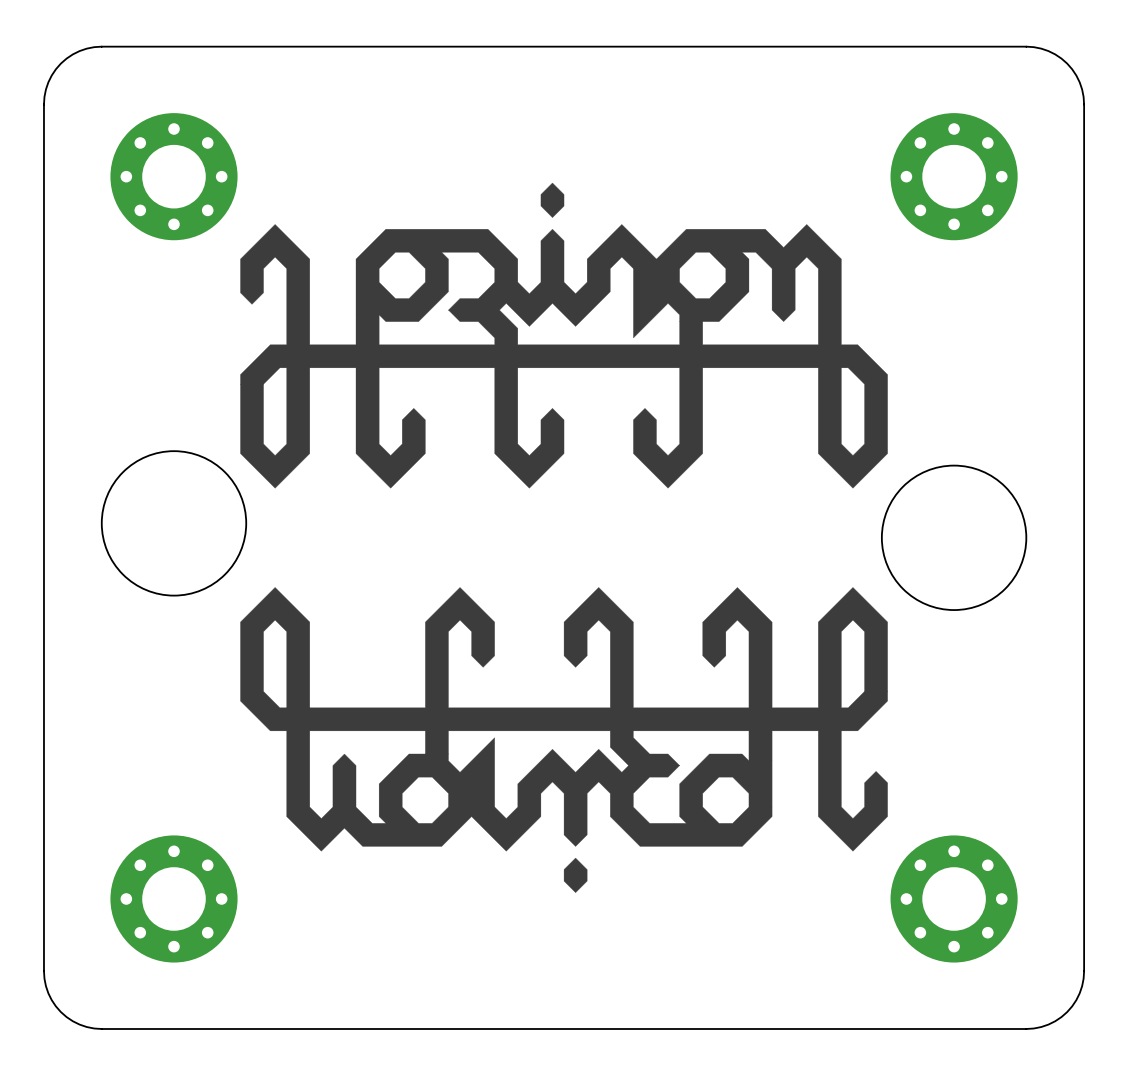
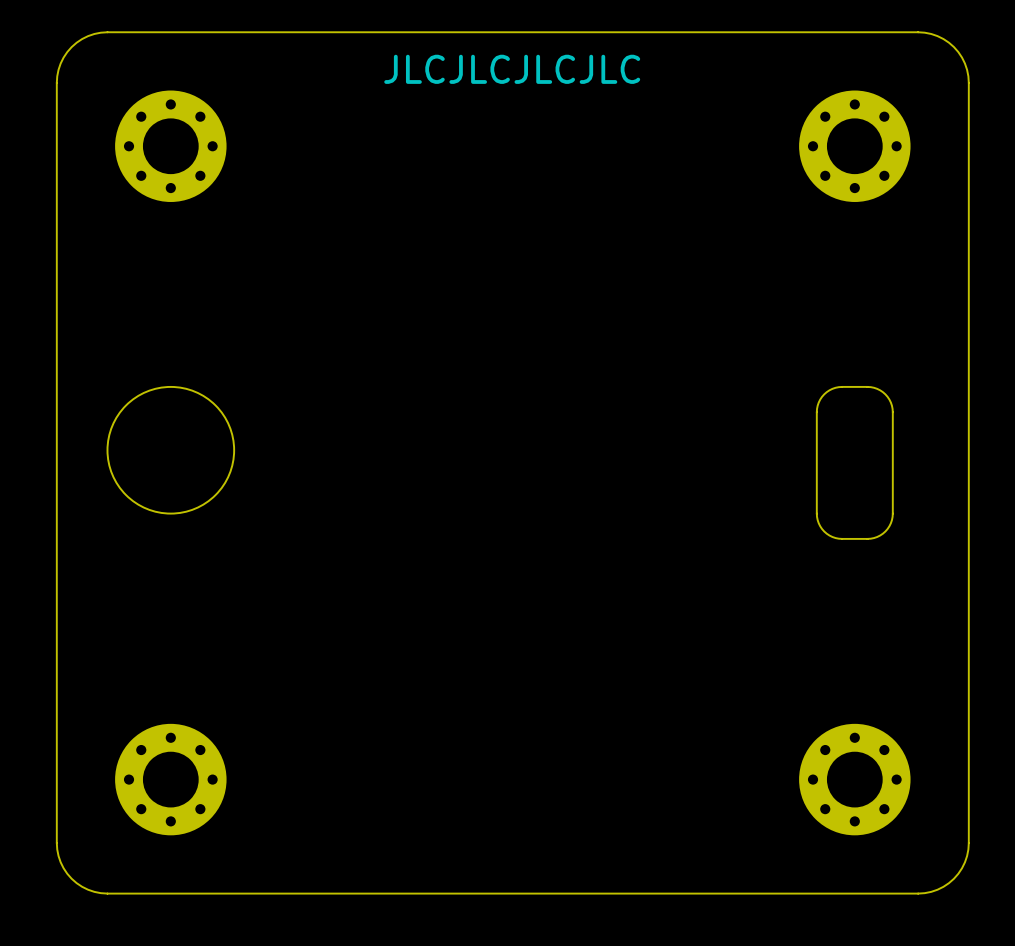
text: none -> JLCJLCJLCJLC (512, 69)
drawing: [240, 182, 888, 489] -> none
board edge: none -> (867, 386) (832, 388) (822, 396) (817, 405) (817, 516) (822, 529) (835, 538) (874, 538) (885, 531) (891, 520) (892, 408) (885, 394) (877, 388) (867, 386)
round board edge: [881, 464, 1028, 611] -> none
drawing: [240, 587, 888, 893] -> none

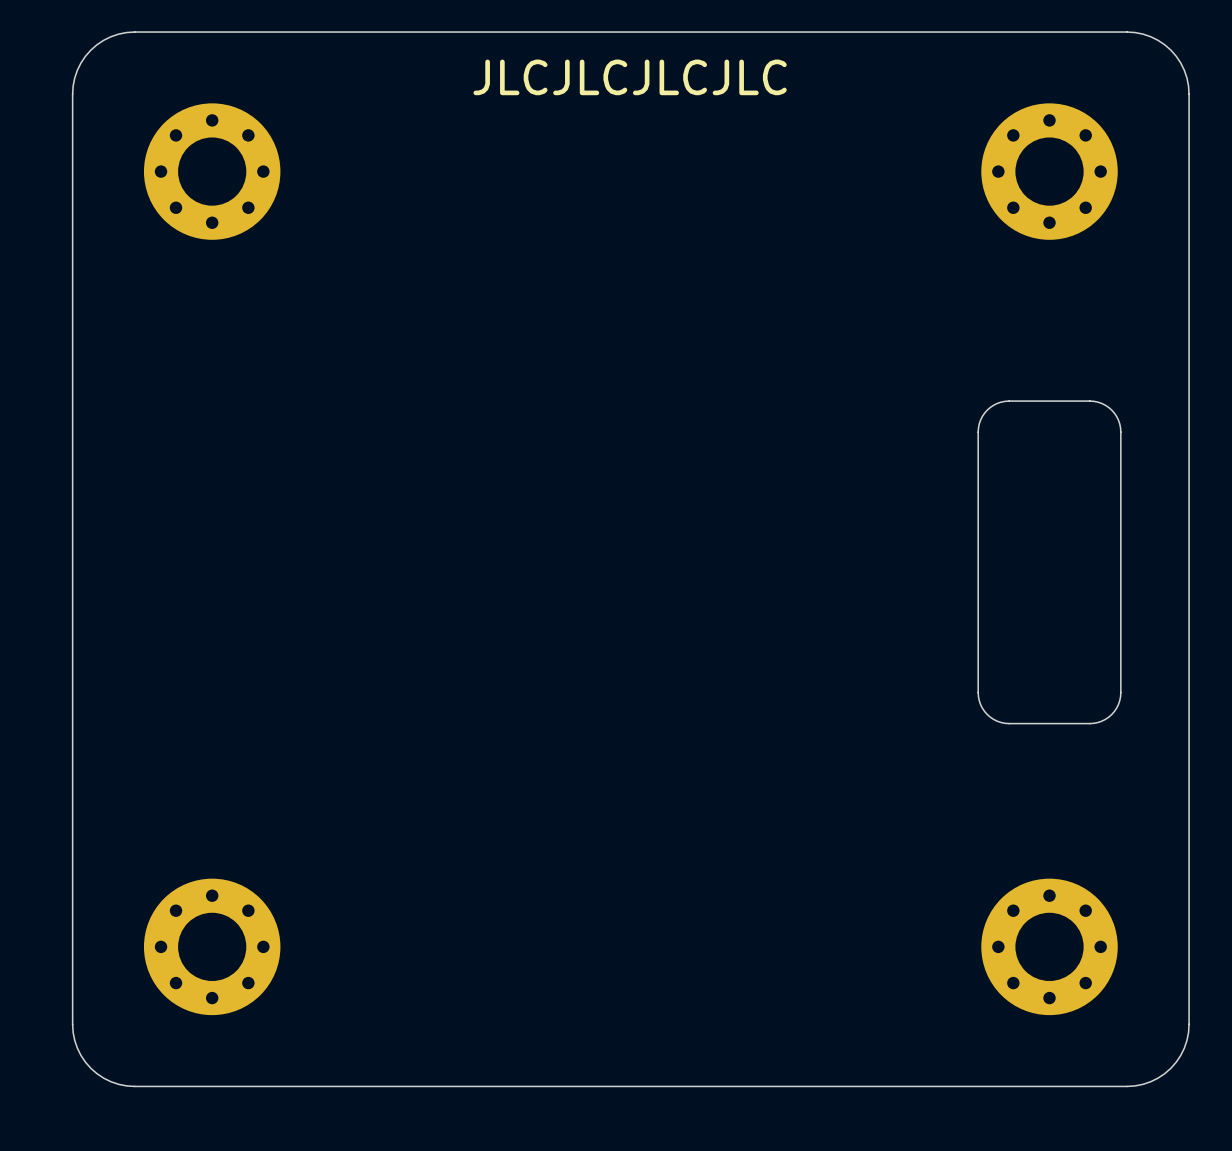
board edge: none -> (1089, 401) (1001, 402) (987, 410) (979, 424) (978, 696) (984, 711) (990, 717) (1001, 722) (1093, 723) (1101, 721) (1111, 714) (1119, 700) (1120, 428) (1116, 416) (1111, 410) (1101, 403) (1089, 401)
round board edge: [106, 386, 235, 515] -> none
board edge: (867, 386) (832, 388) (822, 396) (817, 405) (817, 516) (822, 529) (835, 538) (874, 538) (885, 531) (891, 520) (892, 408) (885, 394) (877, 388) (867, 386) -> none

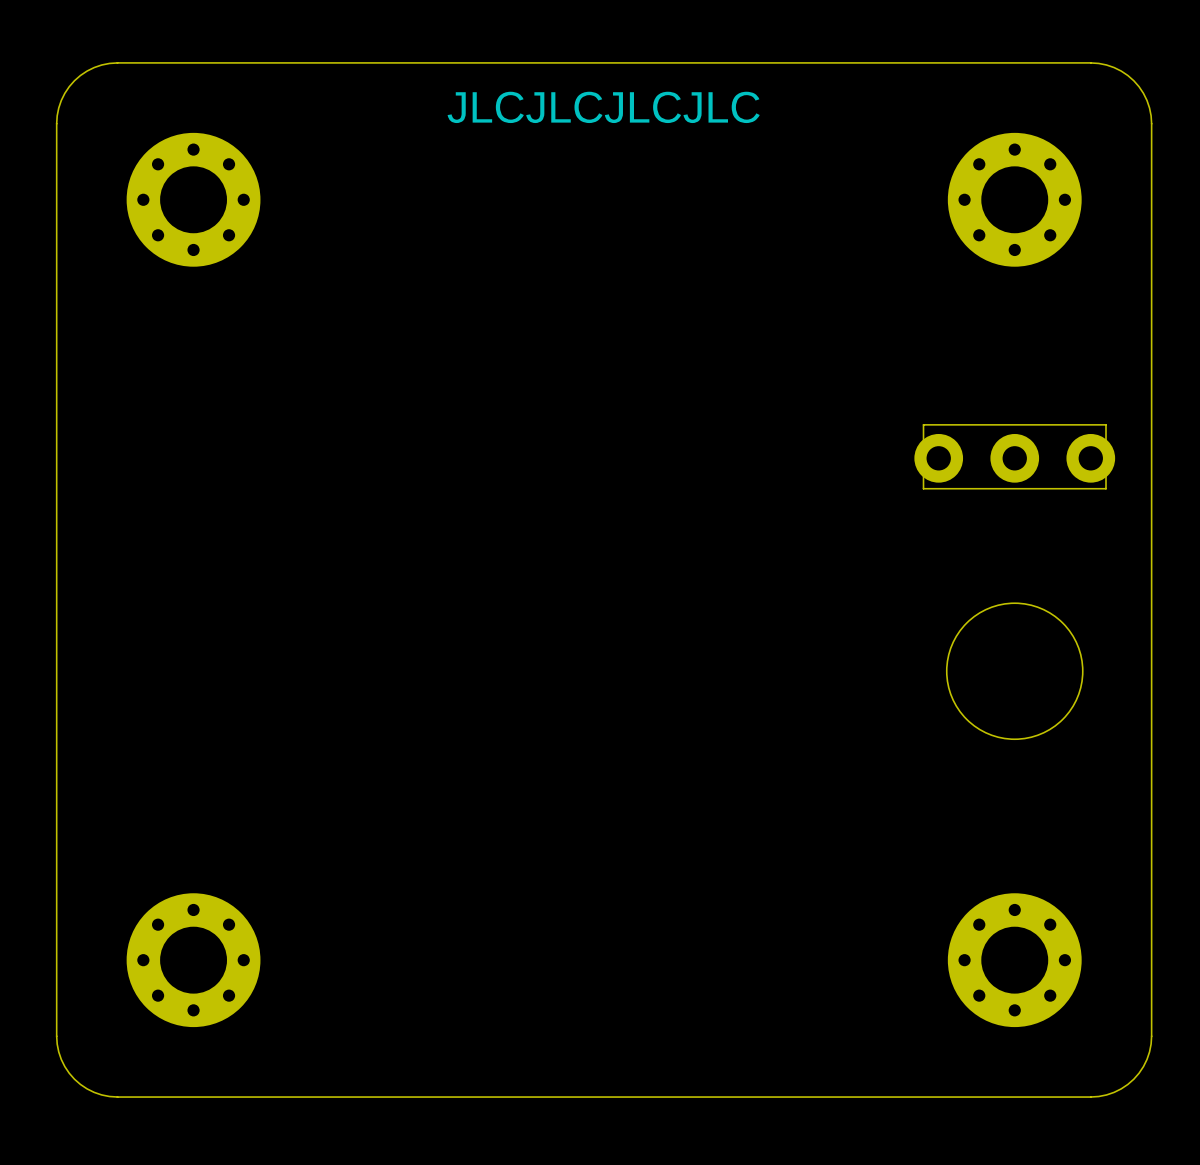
board edge: (1089, 401) (1101, 403) (1111, 410) (1118, 420) (1120, 432) (1120, 696) (1116, 708) (1111, 714) (1101, 721) (1089, 723) (1001, 722) (987, 714) (979, 700) (978, 428) (982, 416) (987, 410) (997, 403) (1009, 401) -> (1054, 424) (1106, 424) (1106, 488) (923, 488) (923, 424) (975, 424)
part: none -> (1014, 458)
round board edge: none -> [945, 602, 1084, 740]

